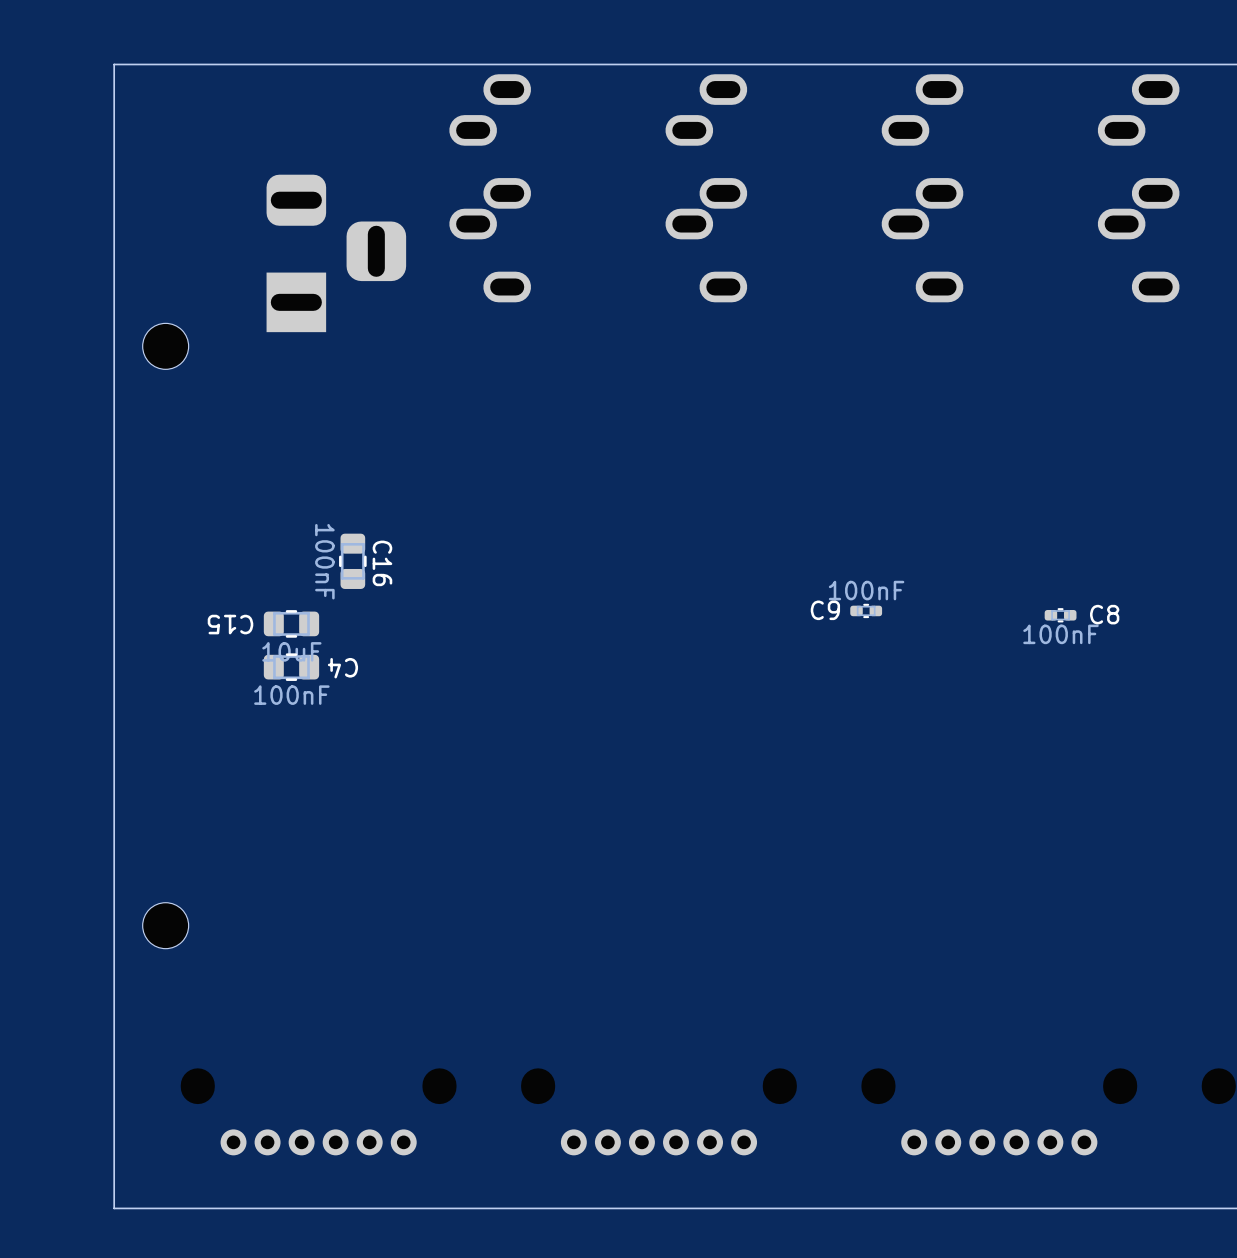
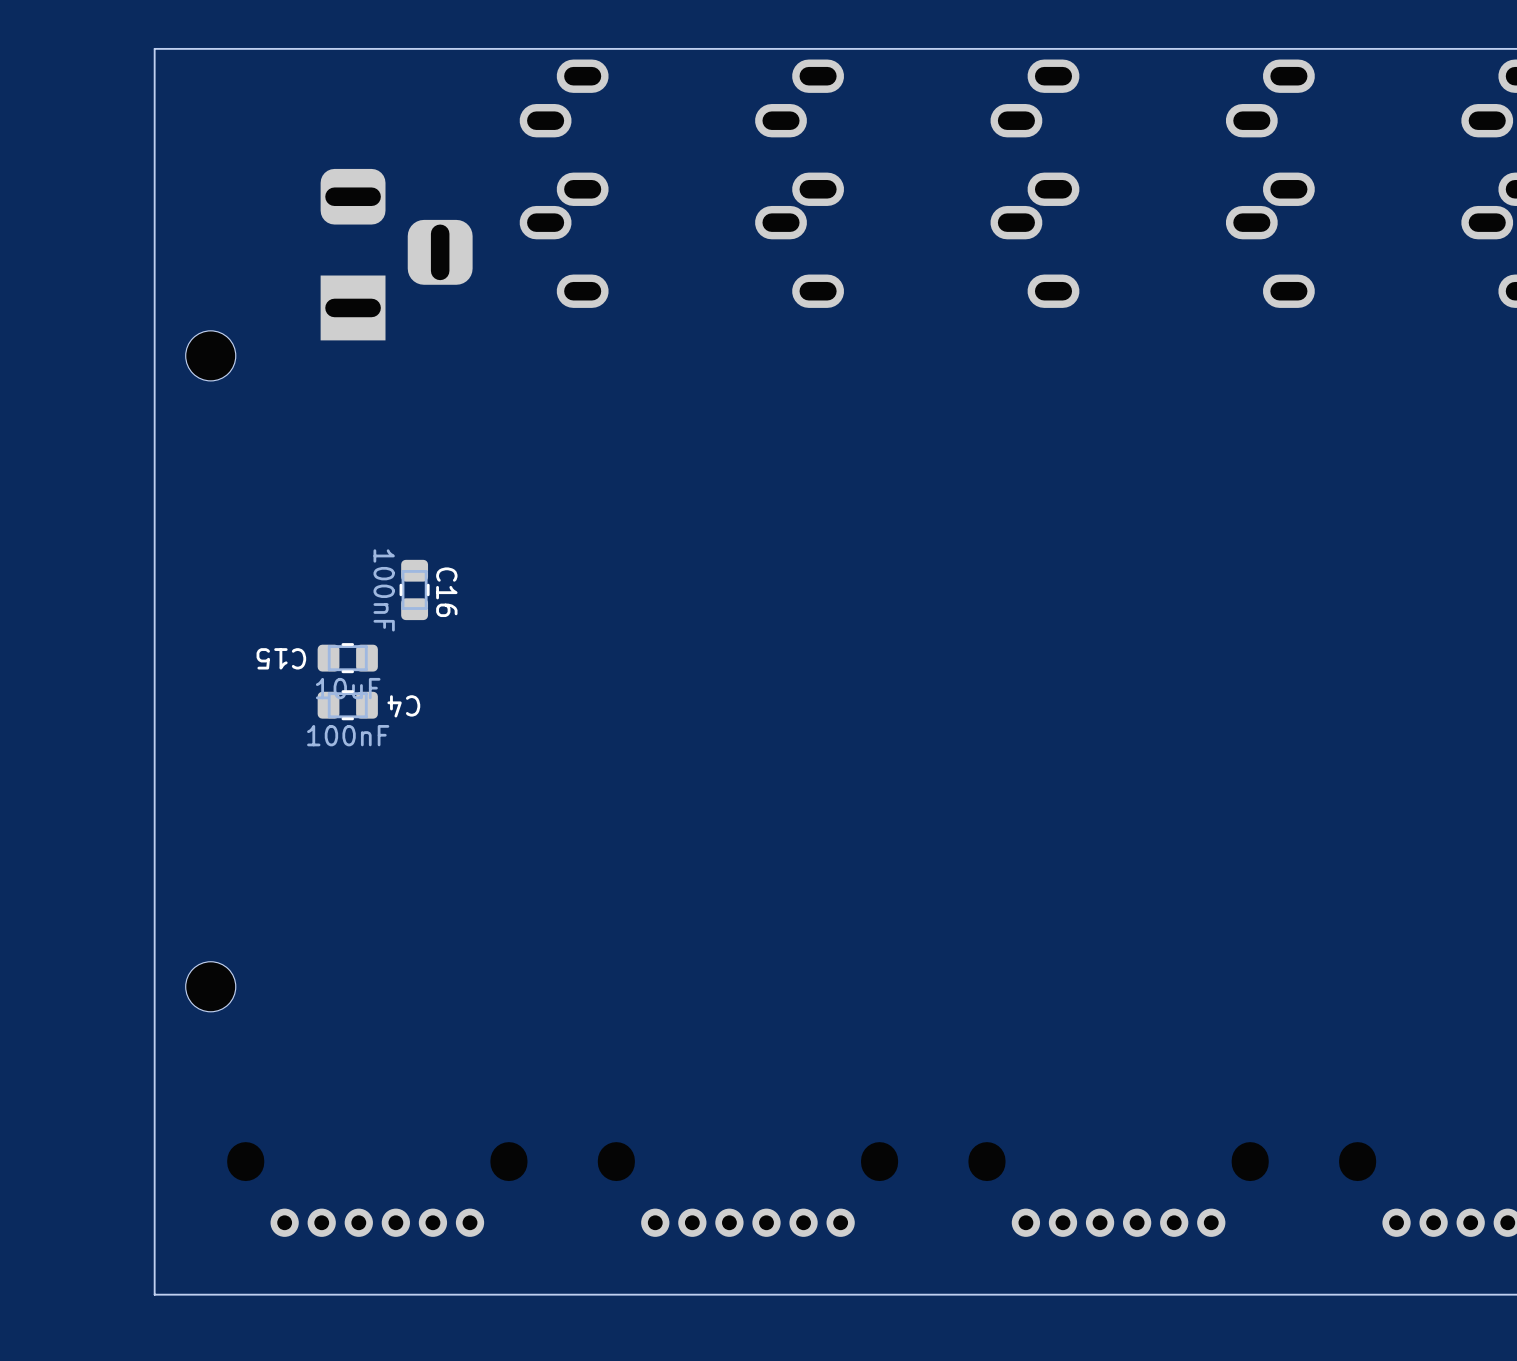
C9: 100nF (866, 610) -> none
C8: 100nF (1060, 615) -> none

